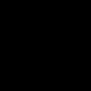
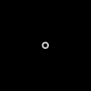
via: none -> (45, 45)

